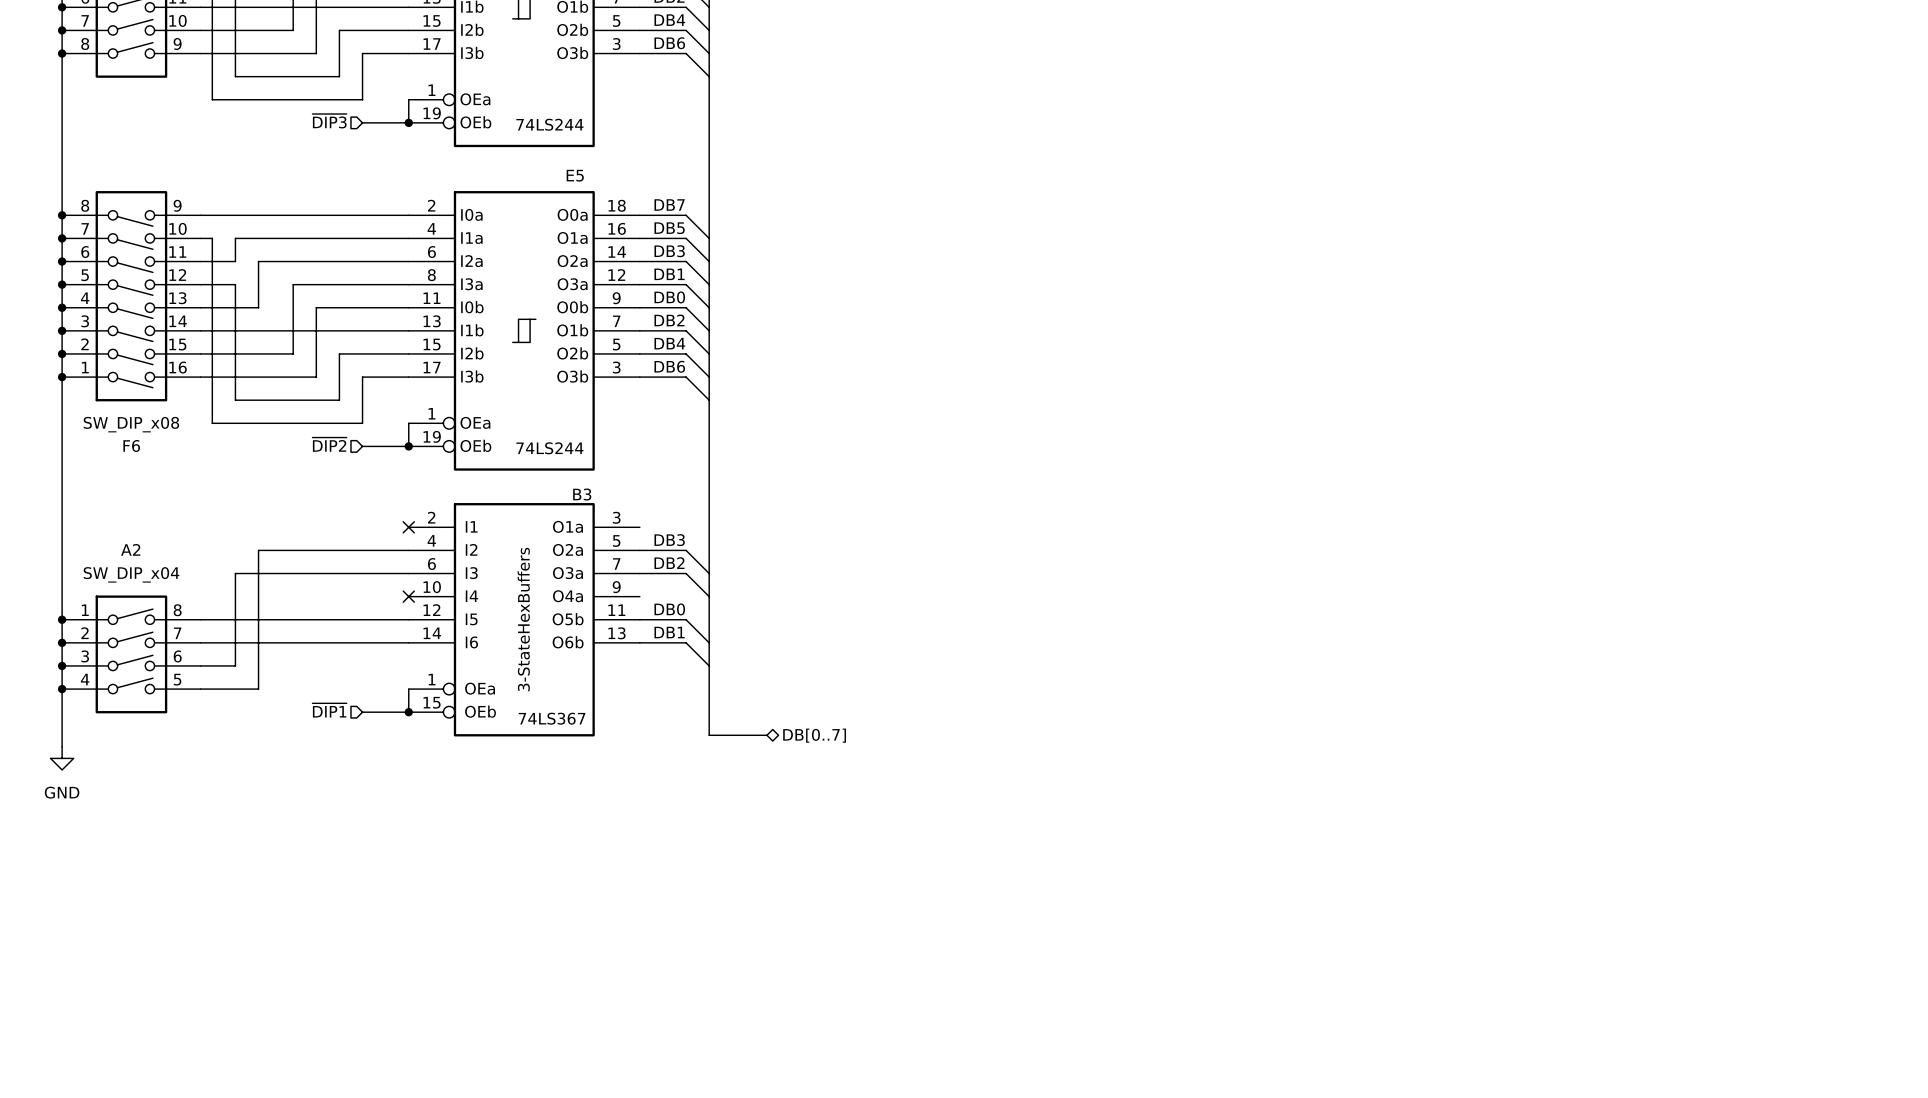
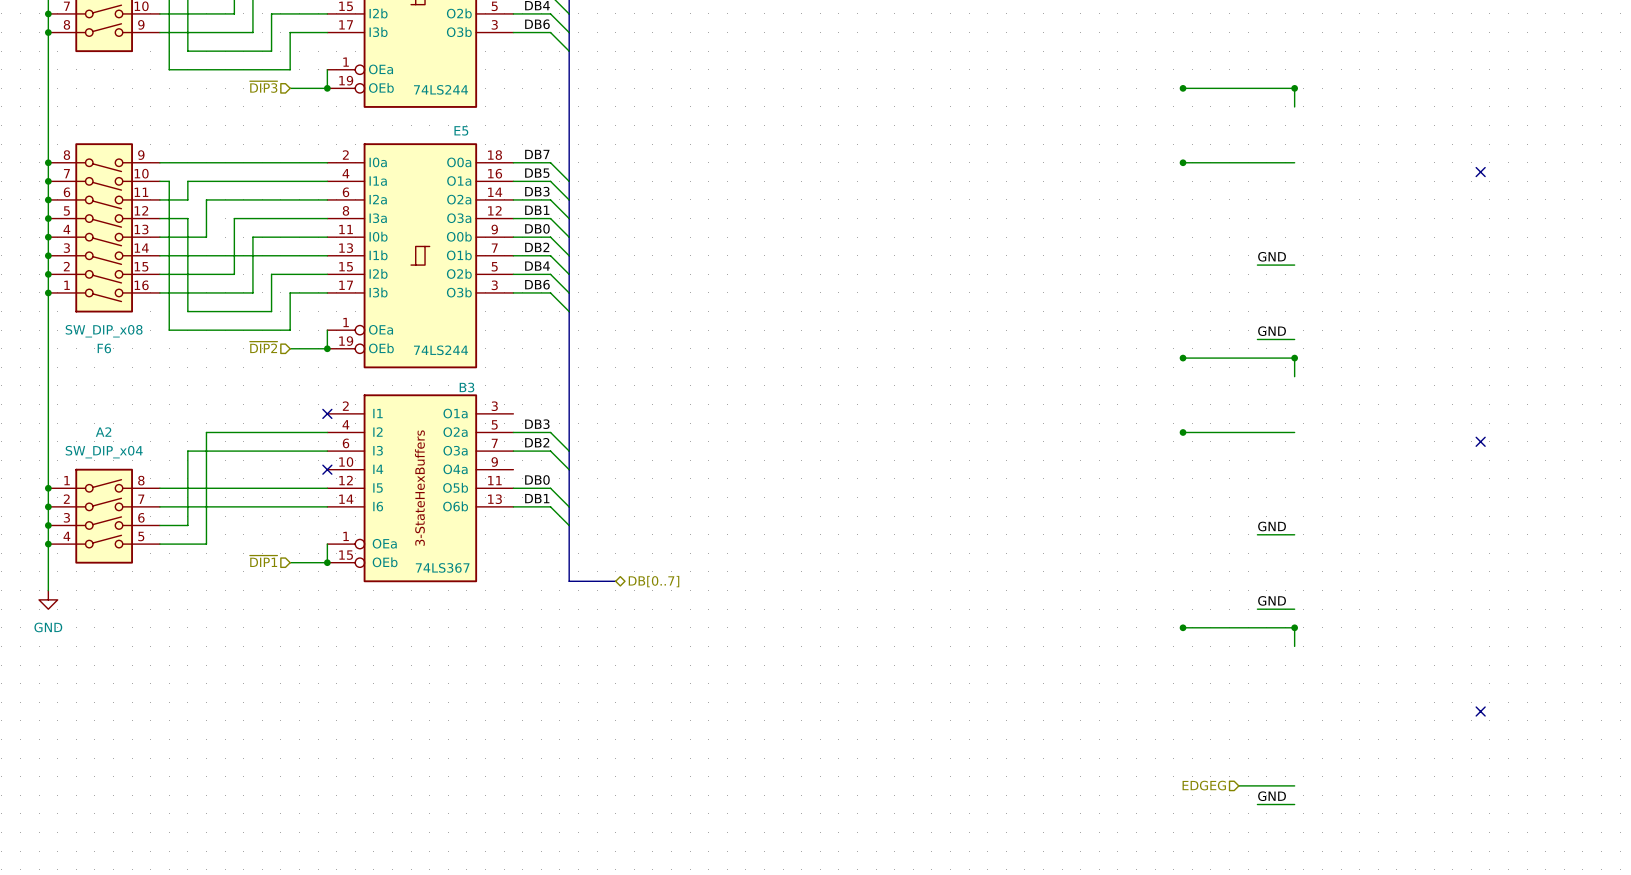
wire: none -> (1183, 88) (1294, 88) (1294, 106)
junction: none -> (1183, 88)
junction: none -> (1294, 88)
wire: none -> (1183, 162) (1294, 162)
junction: none -> (1183, 162)
no-connect mark: none -> (1480, 172)
label: none -> GND (1272, 256)
wire: none -> (1257, 265) (1294, 265)
label: none -> GND (1272, 331)
wire: none -> (1257, 339) (1294, 339)
wire: none -> (1183, 358) (1294, 358) (1294, 376)
junction: none -> (1183, 358)
junction: none -> (1294, 358)
wire: none -> (1183, 432) (1294, 432)
junction: none -> (1183, 432)
no-connect mark: none -> (1480, 441)
label: none -> GND (1272, 526)
wire: none -> (1257, 534) (1294, 534)
label: none -> GND (1272, 600)
wire: none -> (1257, 609) (1294, 609)
wire: none -> (1183, 627) (1294, 627) (1294, 646)
junction: none -> (1183, 627)
junction: none -> (1294, 627)
no-connect mark: none -> (1480, 711)
hierarchical label: none -> EDGEG (1204, 785)
wire: none -> (1238, 785) (1294, 785)
label: none -> GND (1272, 796)
wire: none -> (1257, 804) (1294, 804)

